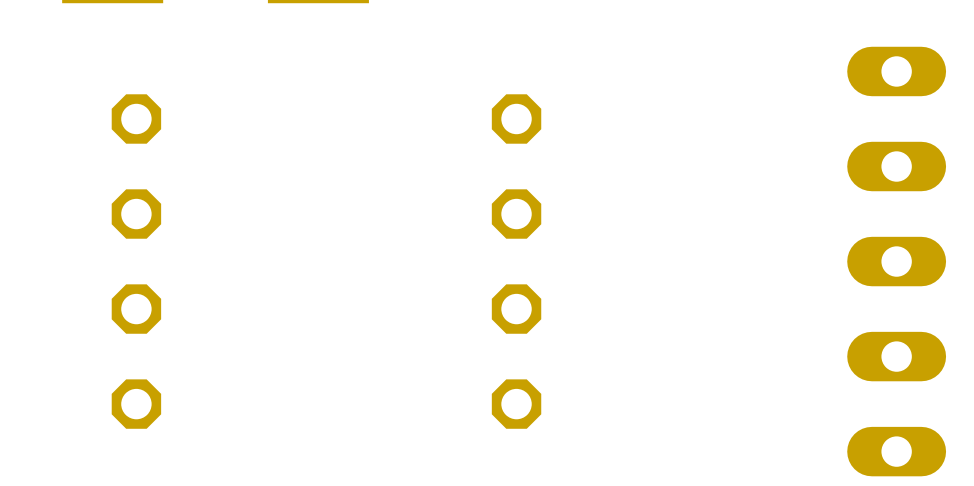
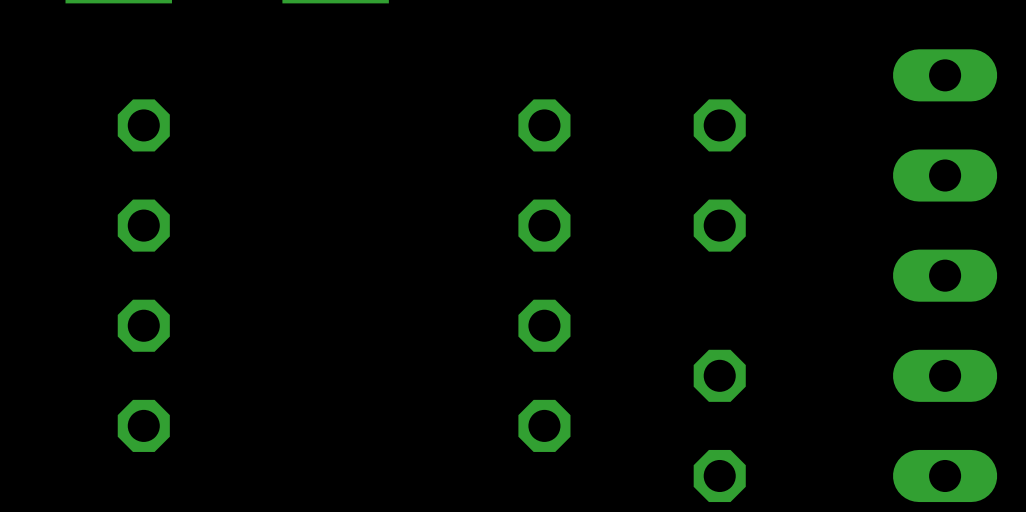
part: none -> (719, 175)
part: none -> (719, 425)

